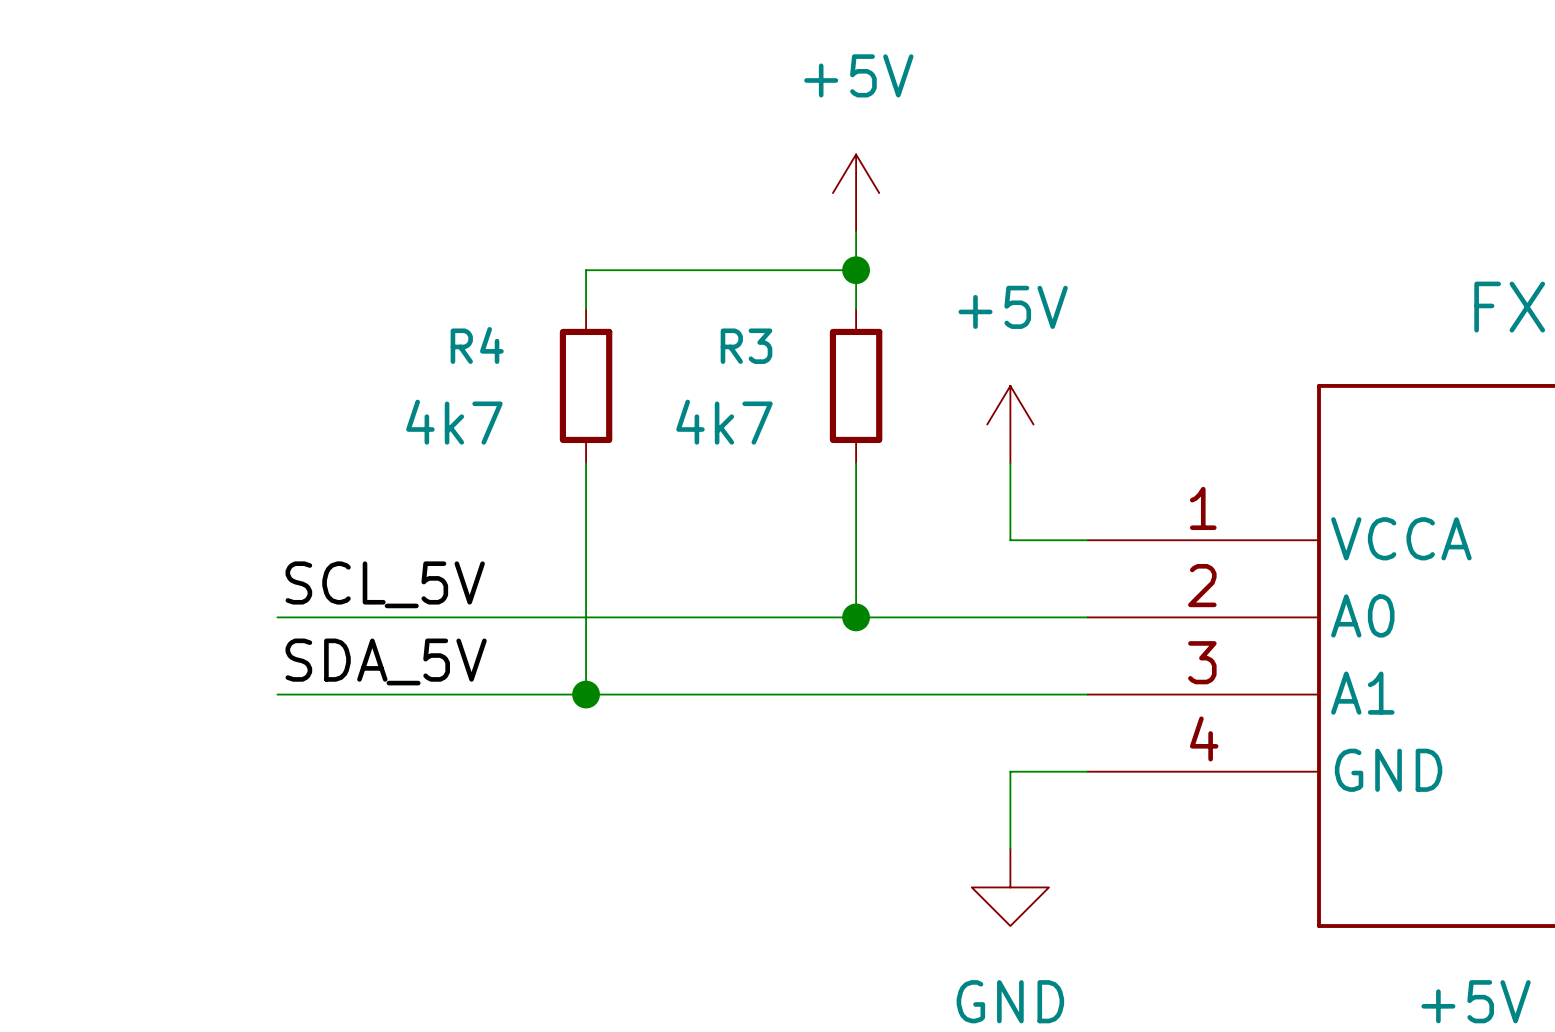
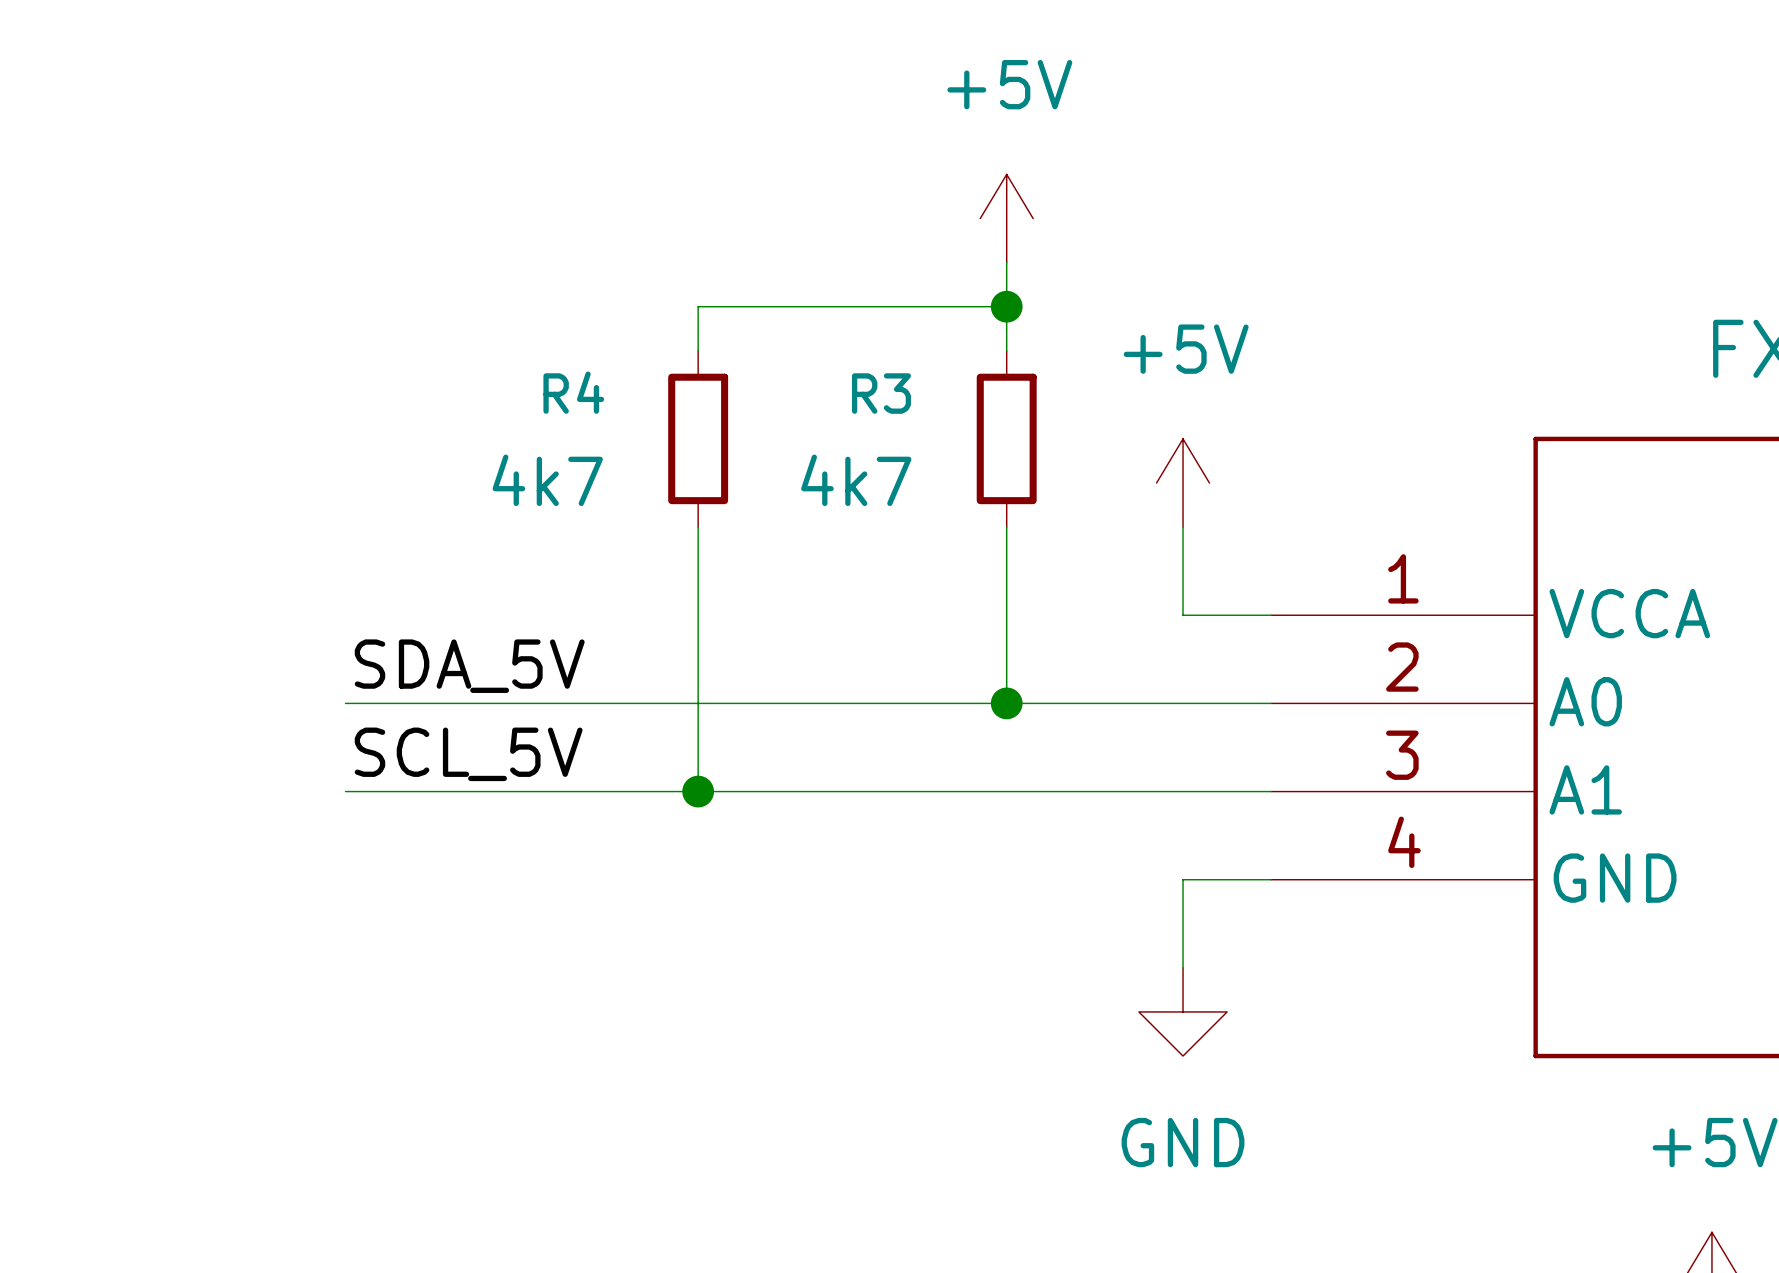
label: SCL_5V (385, 584) -> SDA_5V (469, 666)
label: SDA_5V (386, 661) -> SCL_5V (468, 754)

